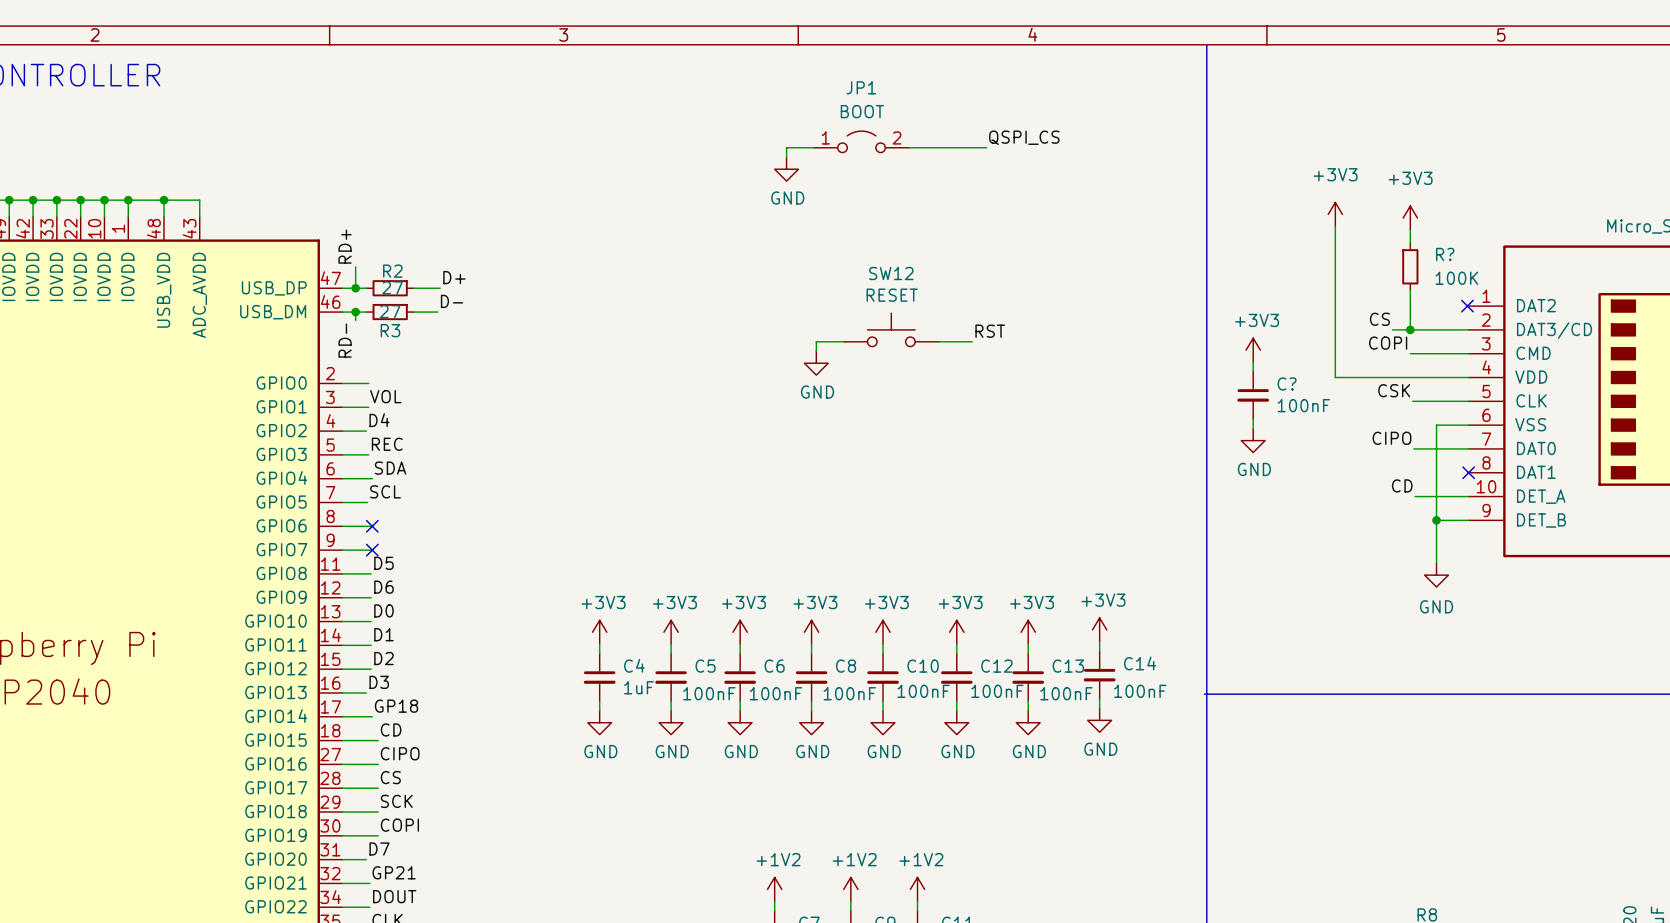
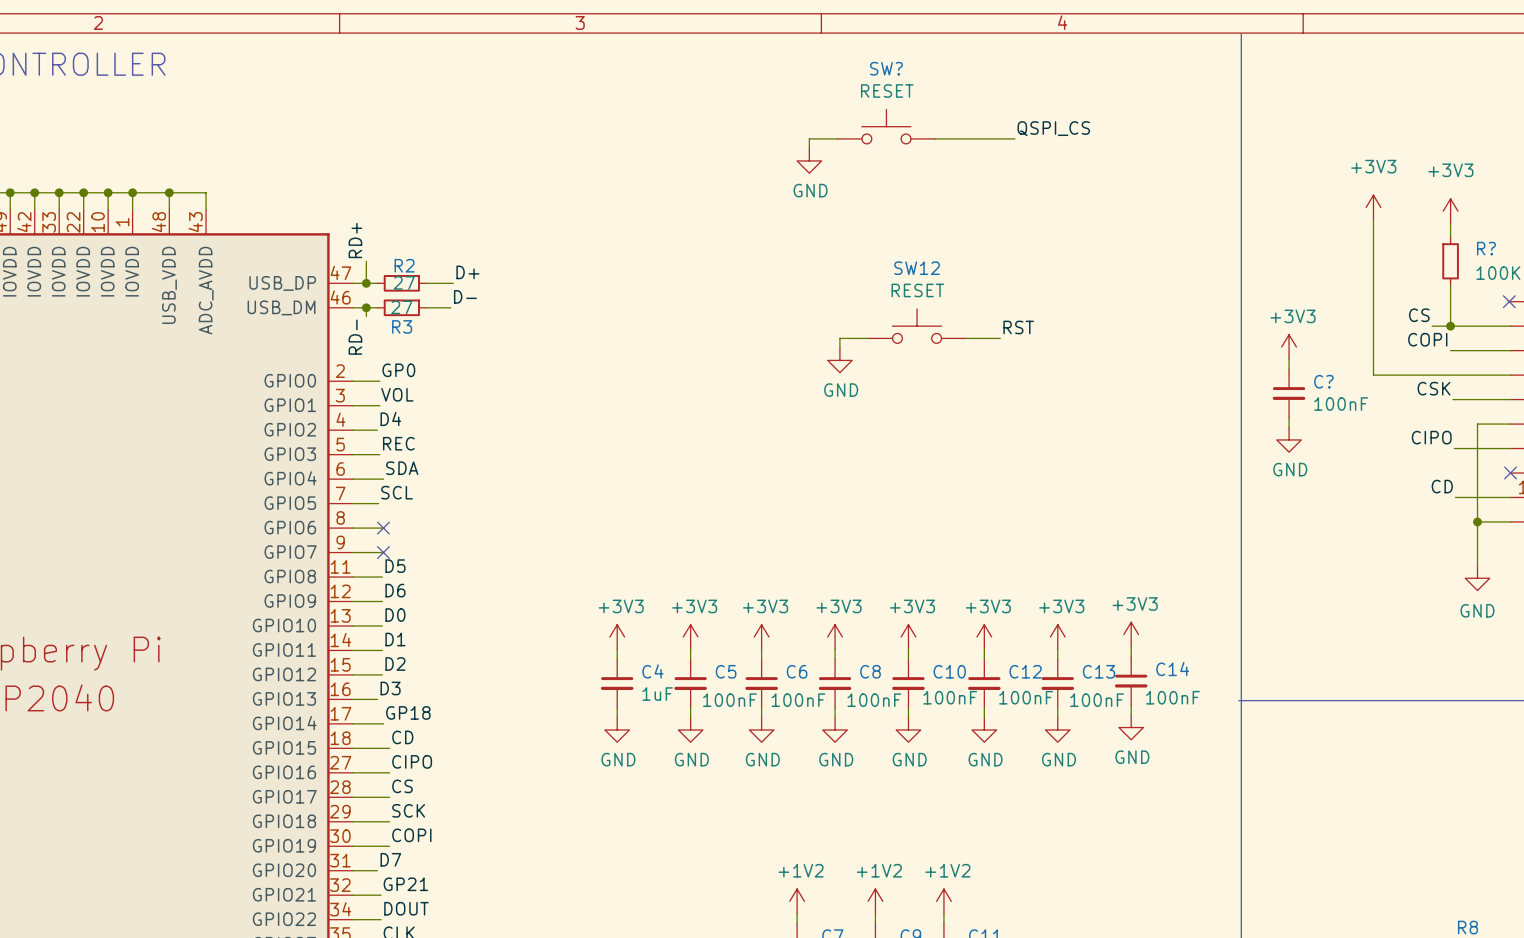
SW?: none -> RESET (886, 126)
JP1: BOOT (861, 141) -> none
label: none -> GP0 (398, 370)

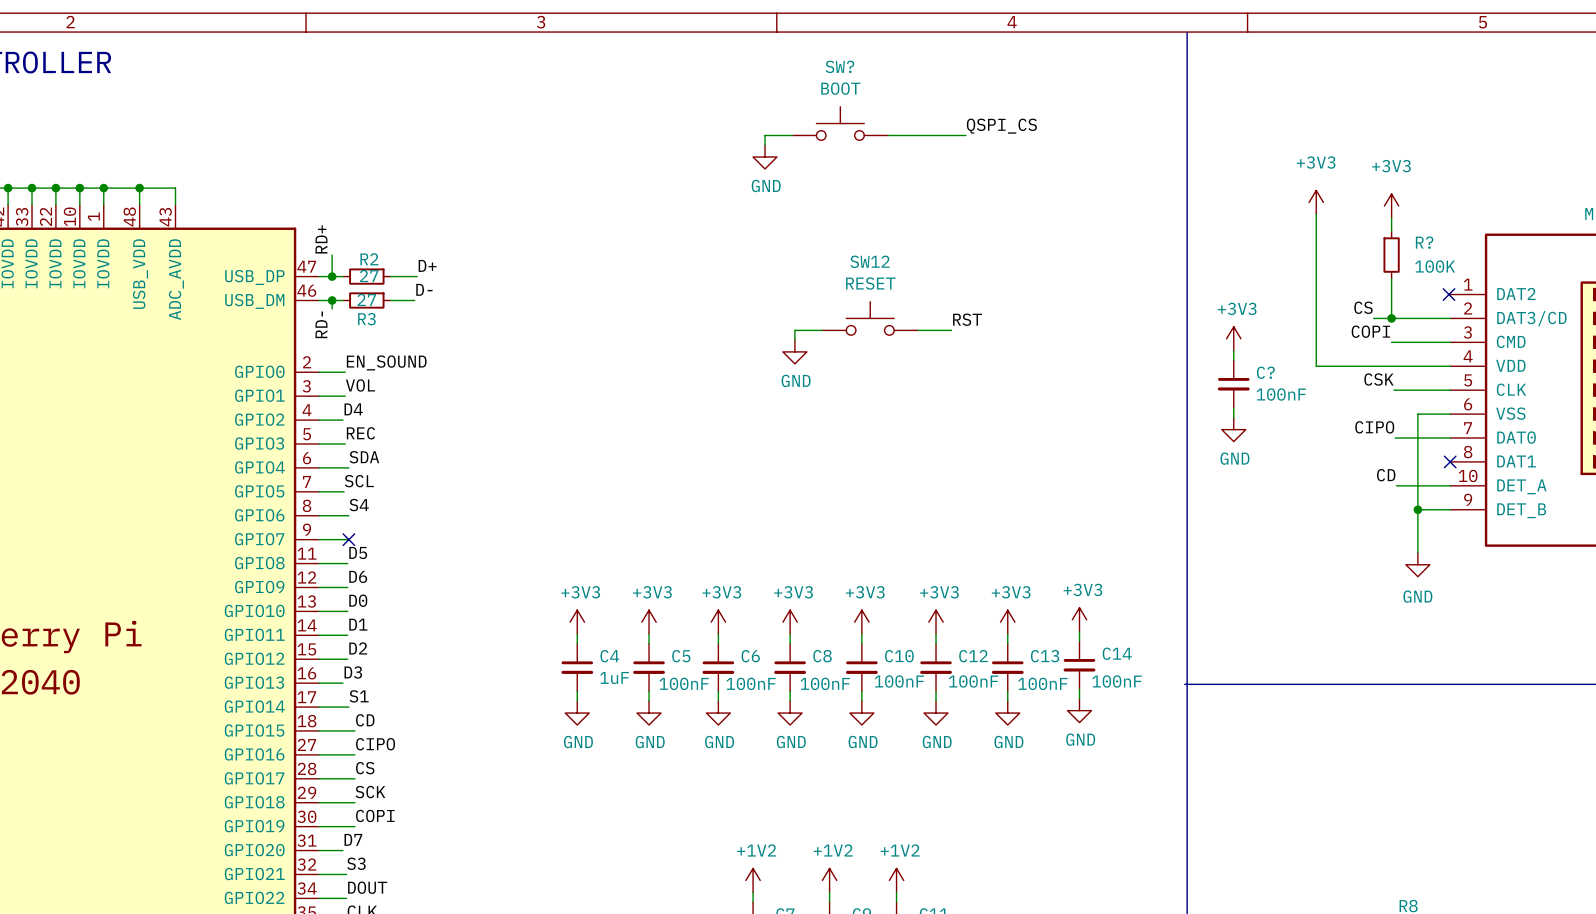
SW? value: RESET (887, 90) -> BOOT (840, 88)
label: GP0 (398, 370) -> EN_SOUND (386, 362)
label: none -> S4 (359, 505)
no-connect mark: (383, 528) -> none
label: GP18 (408, 712) -> S1 (359, 696)
label: GP21 (405, 884) -> S3 (356, 863)

